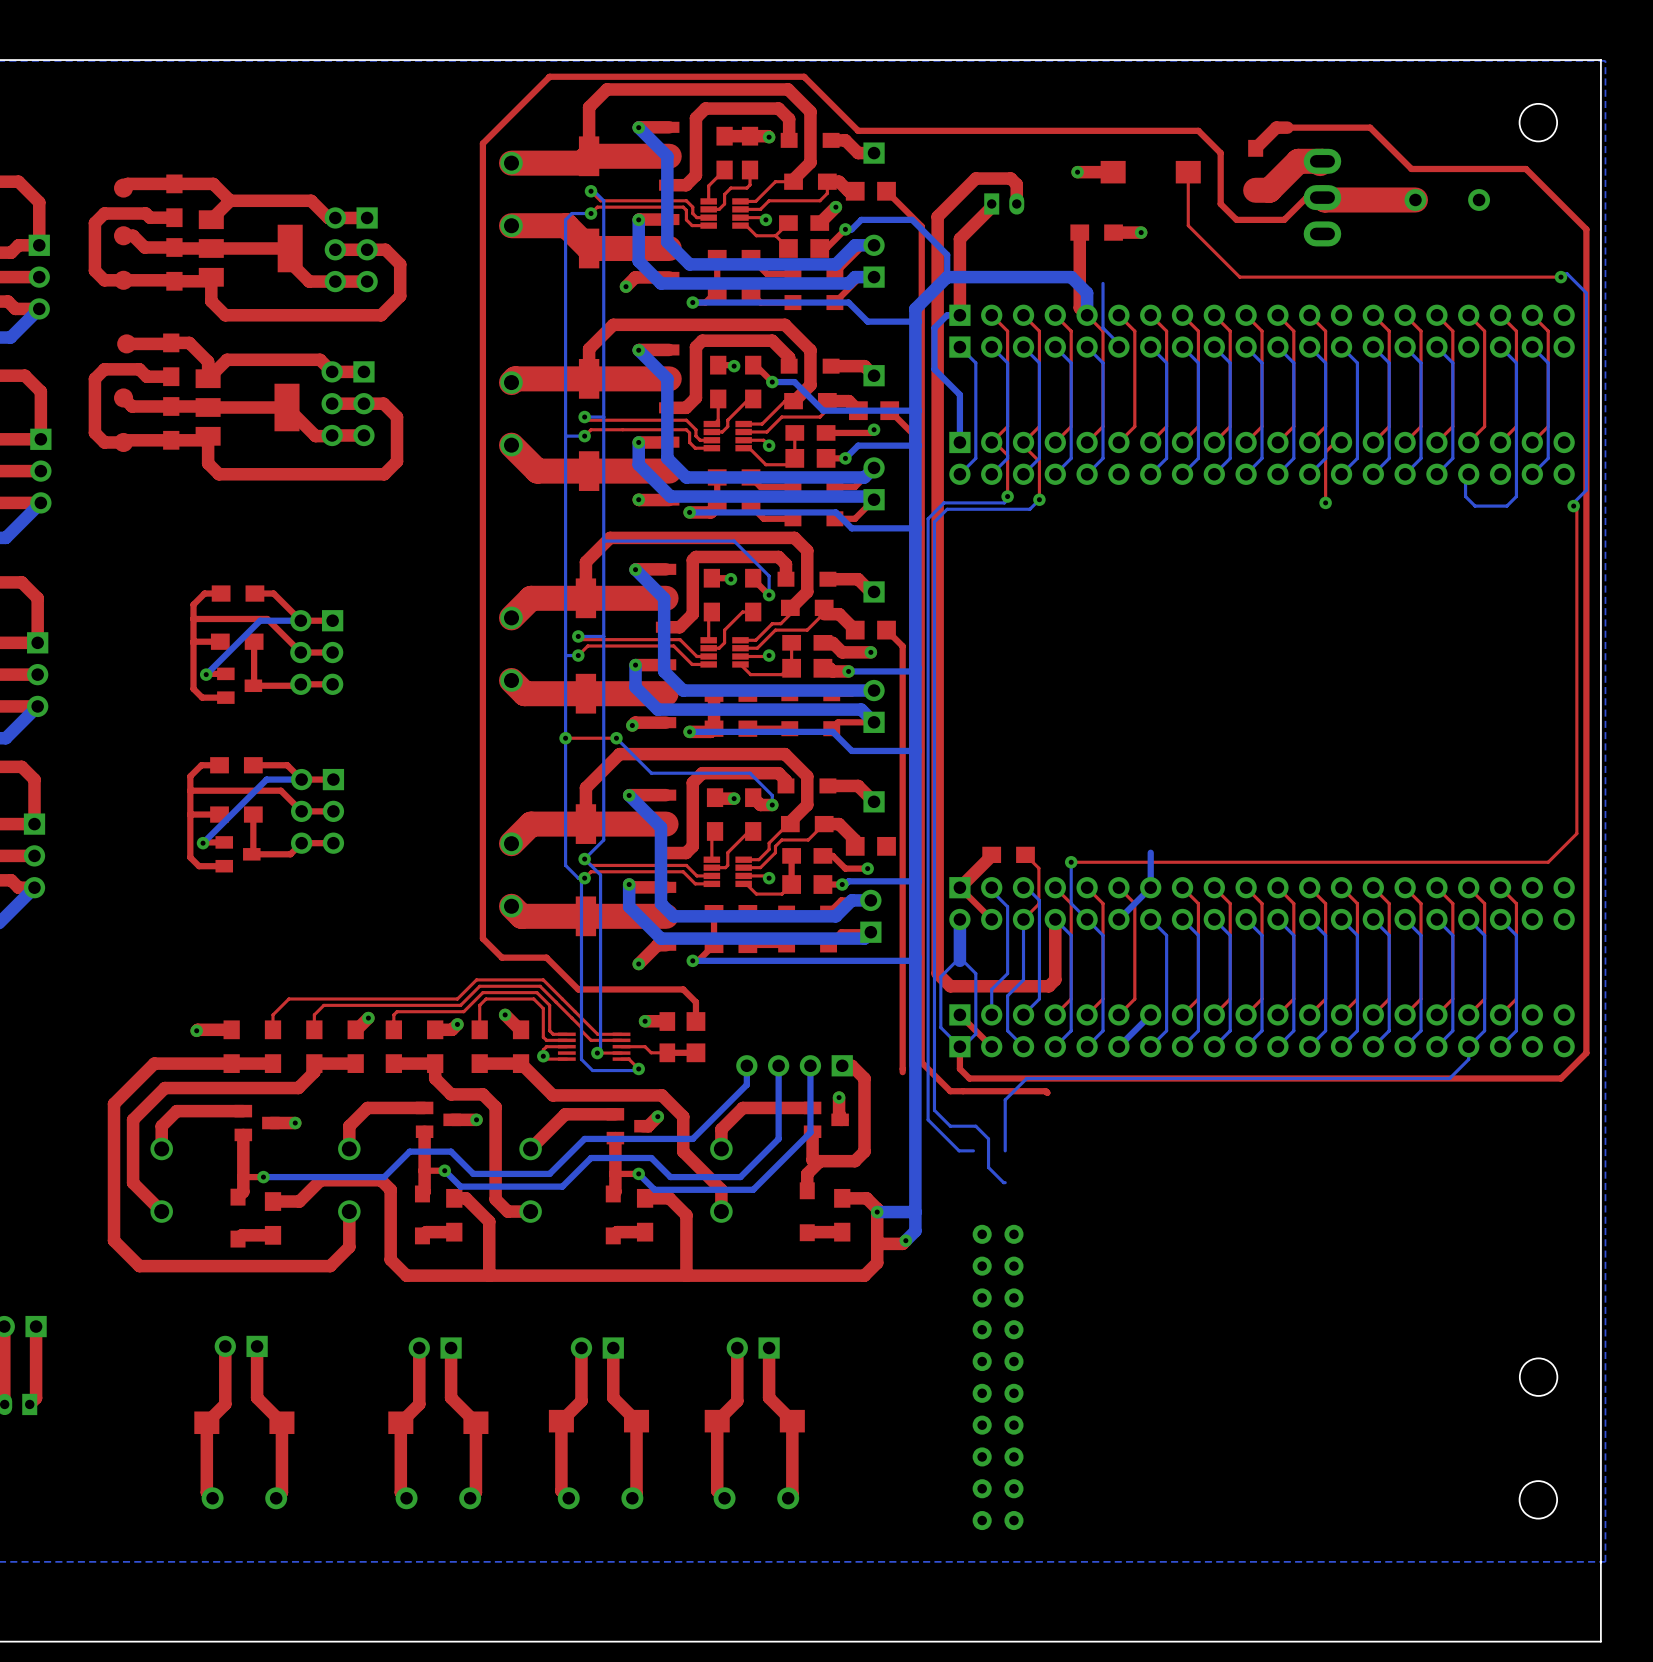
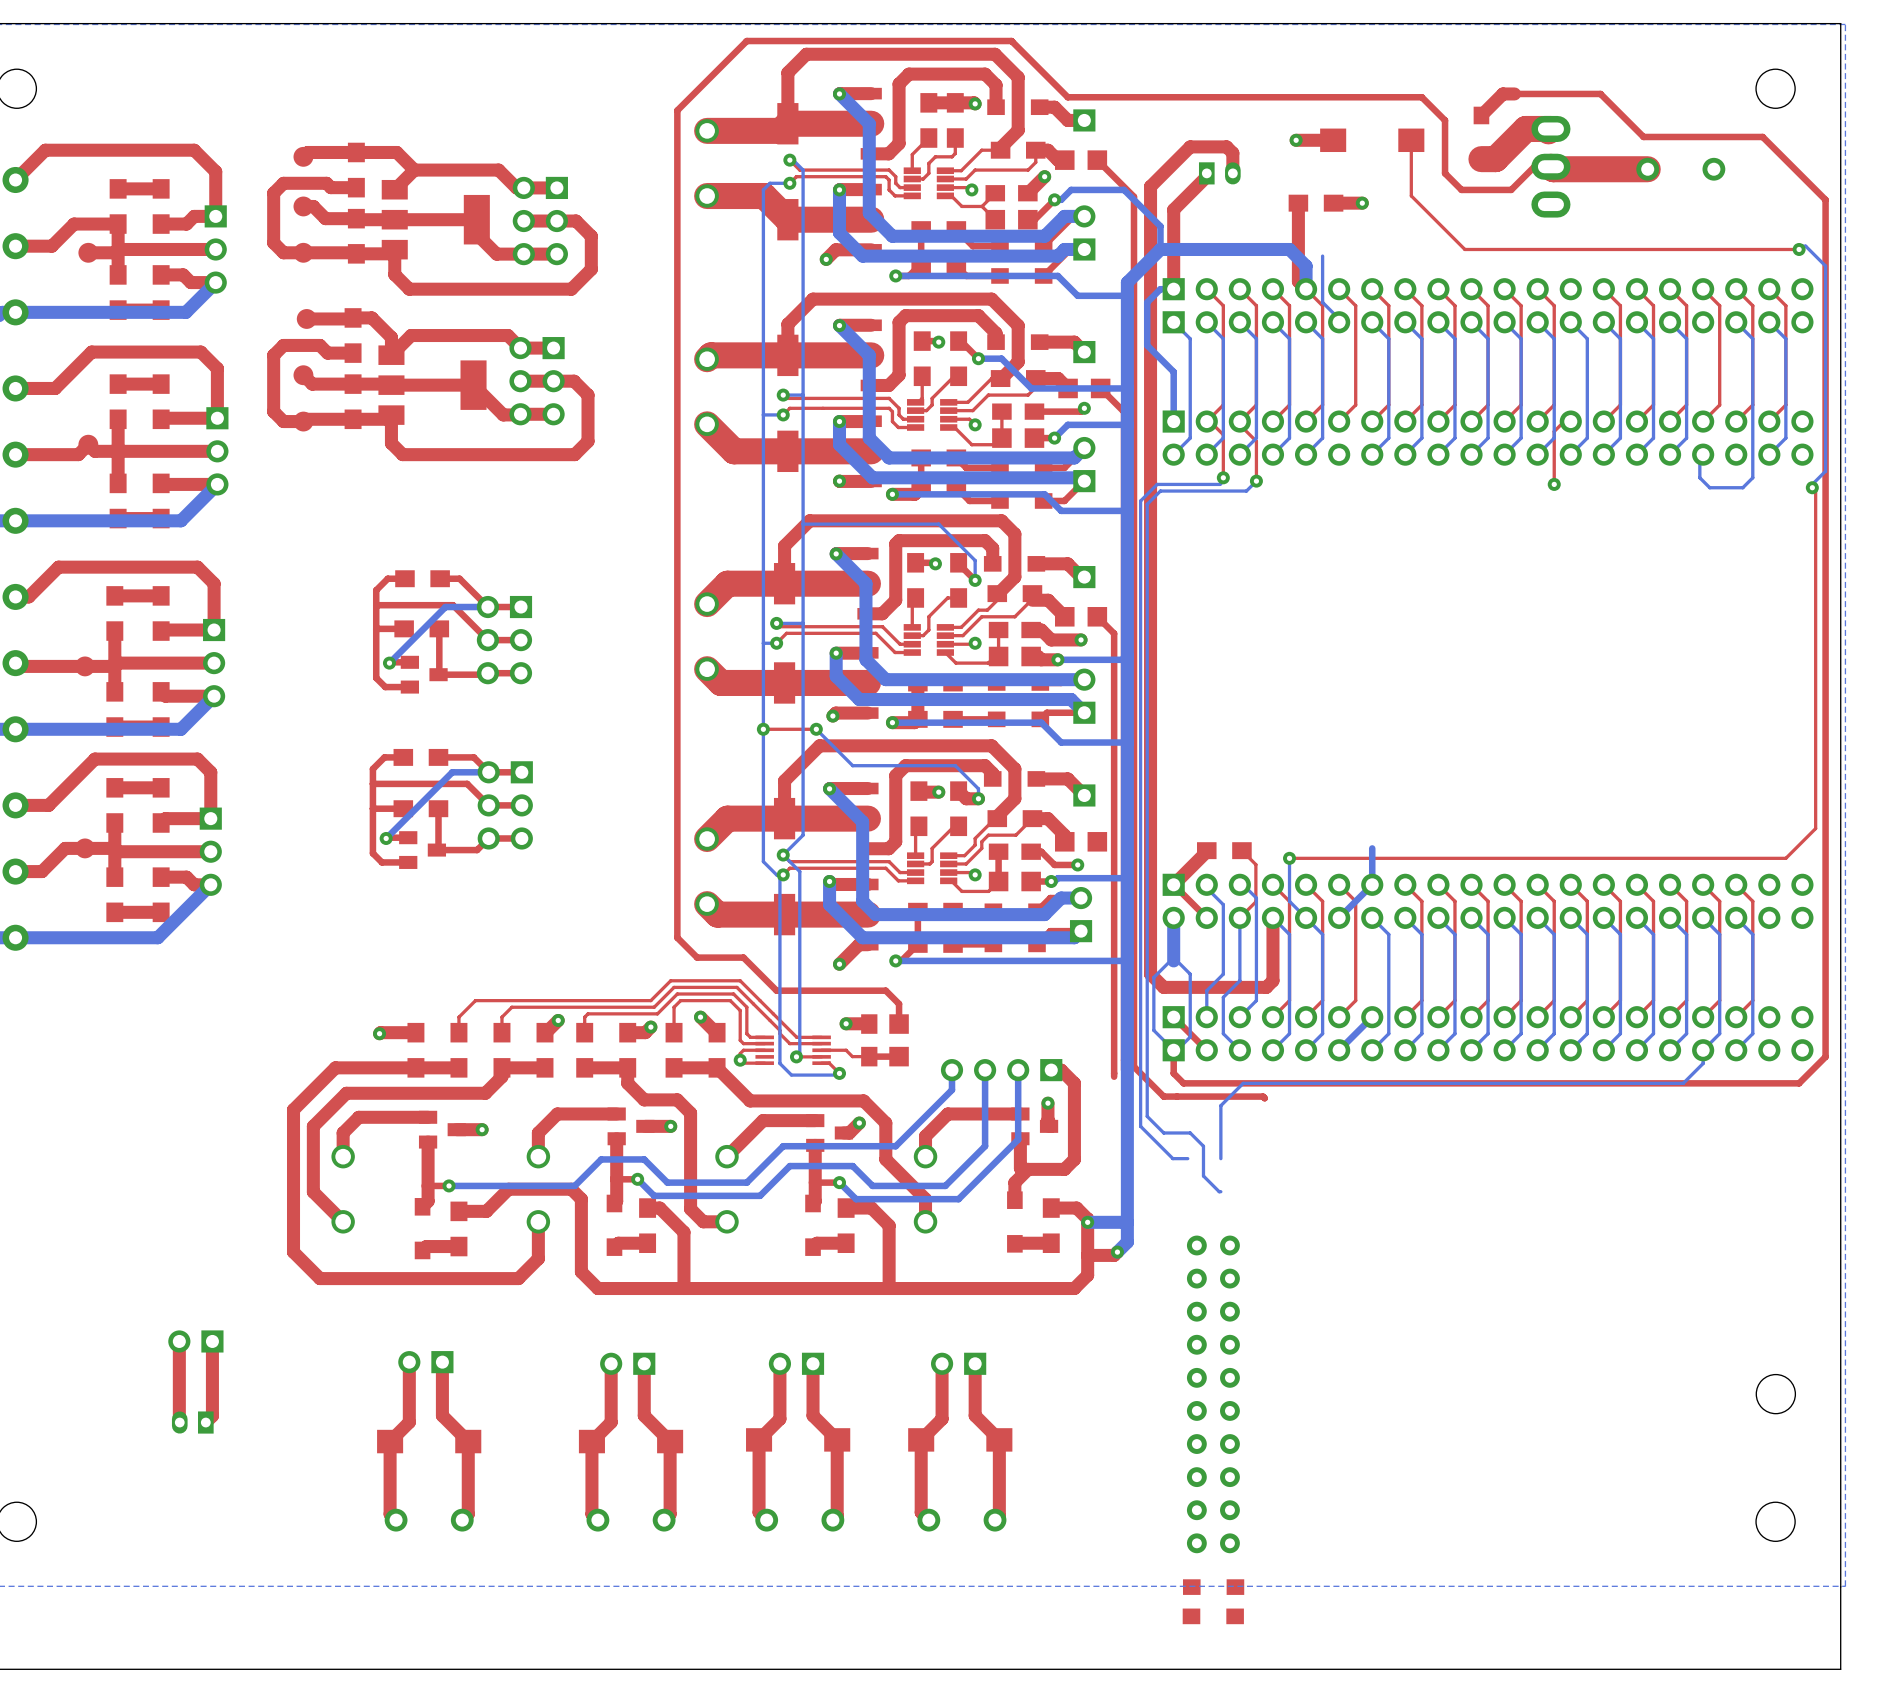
part: none -> (1213, 1587)
part: none -> (1213, 1616)

